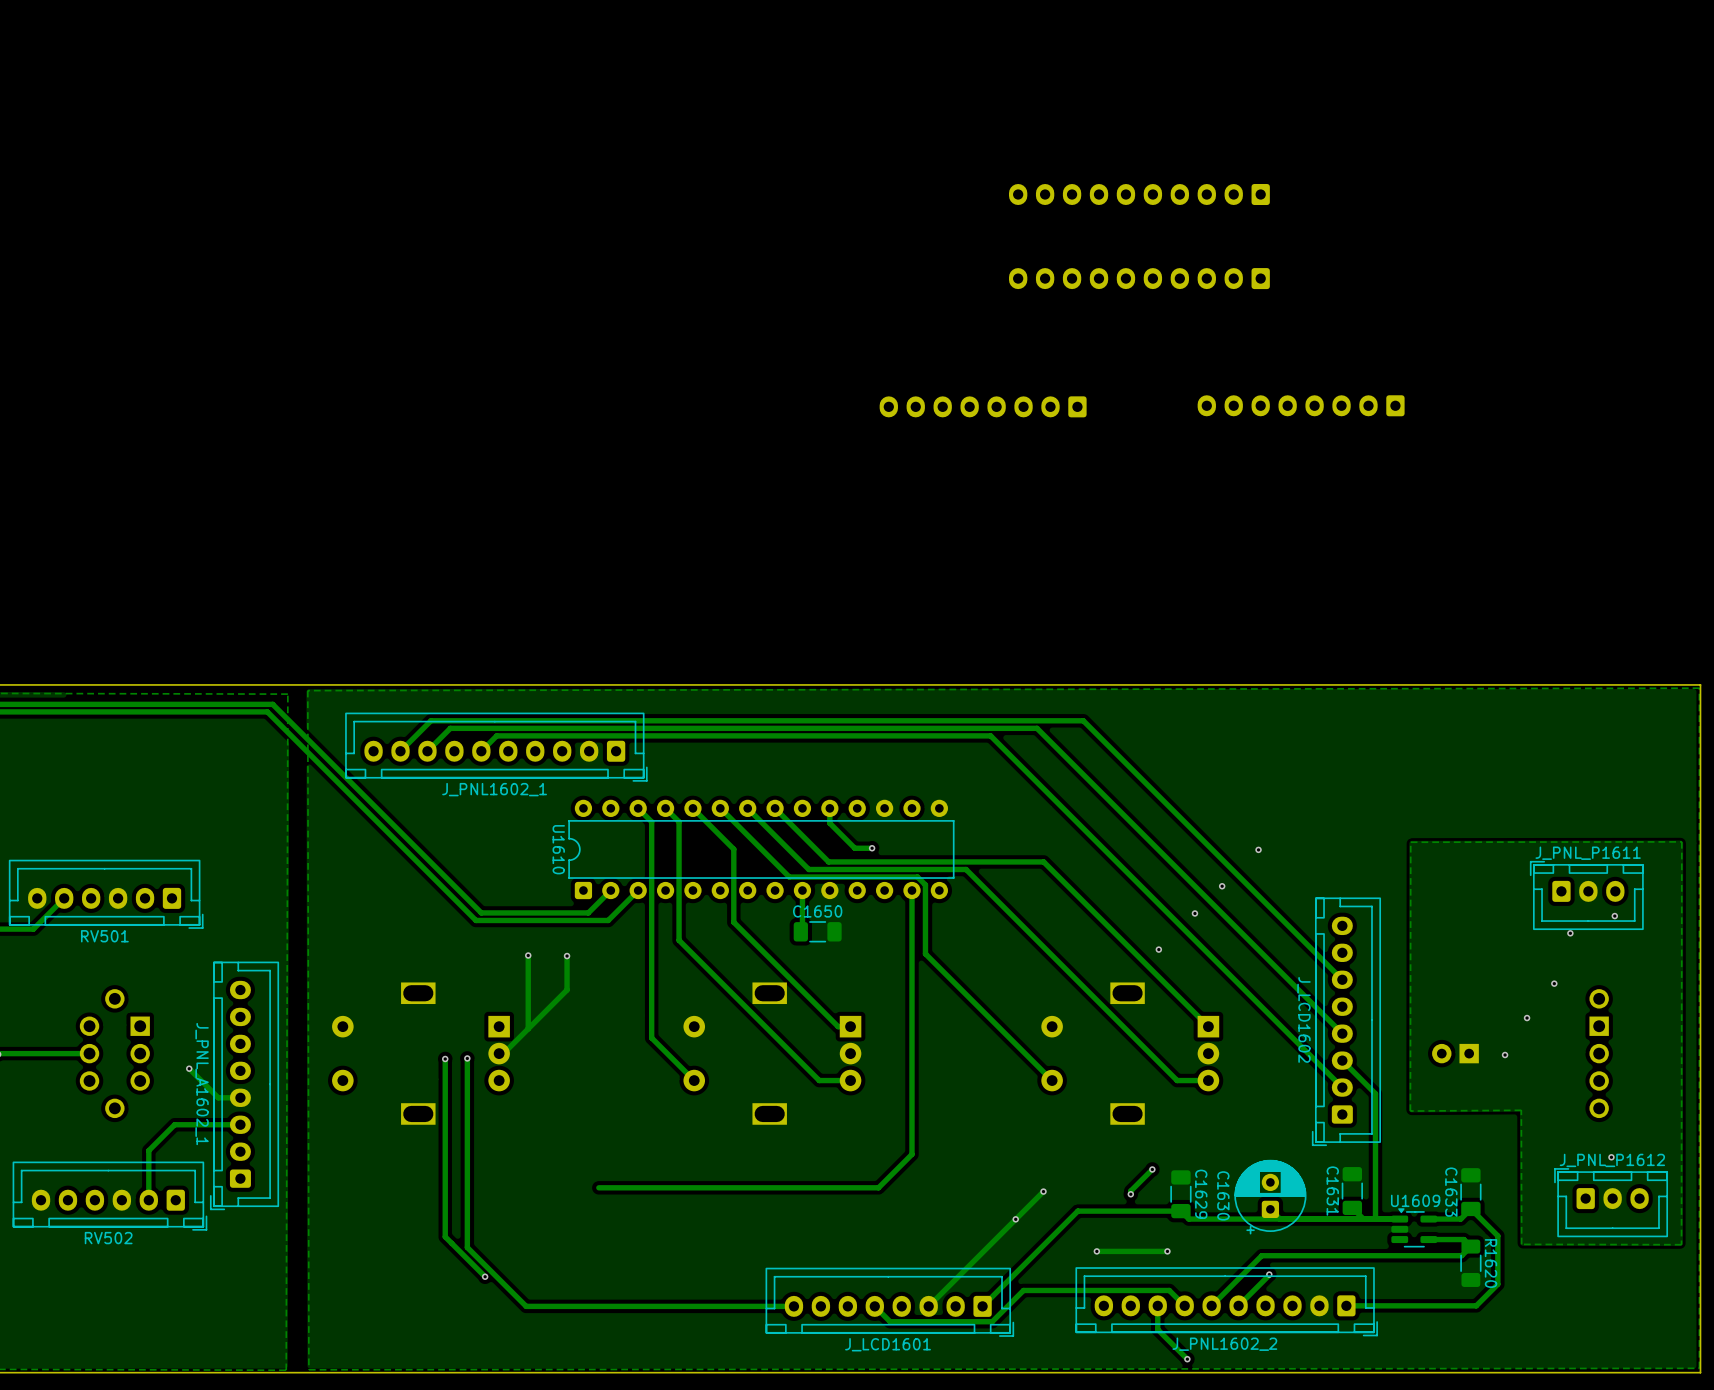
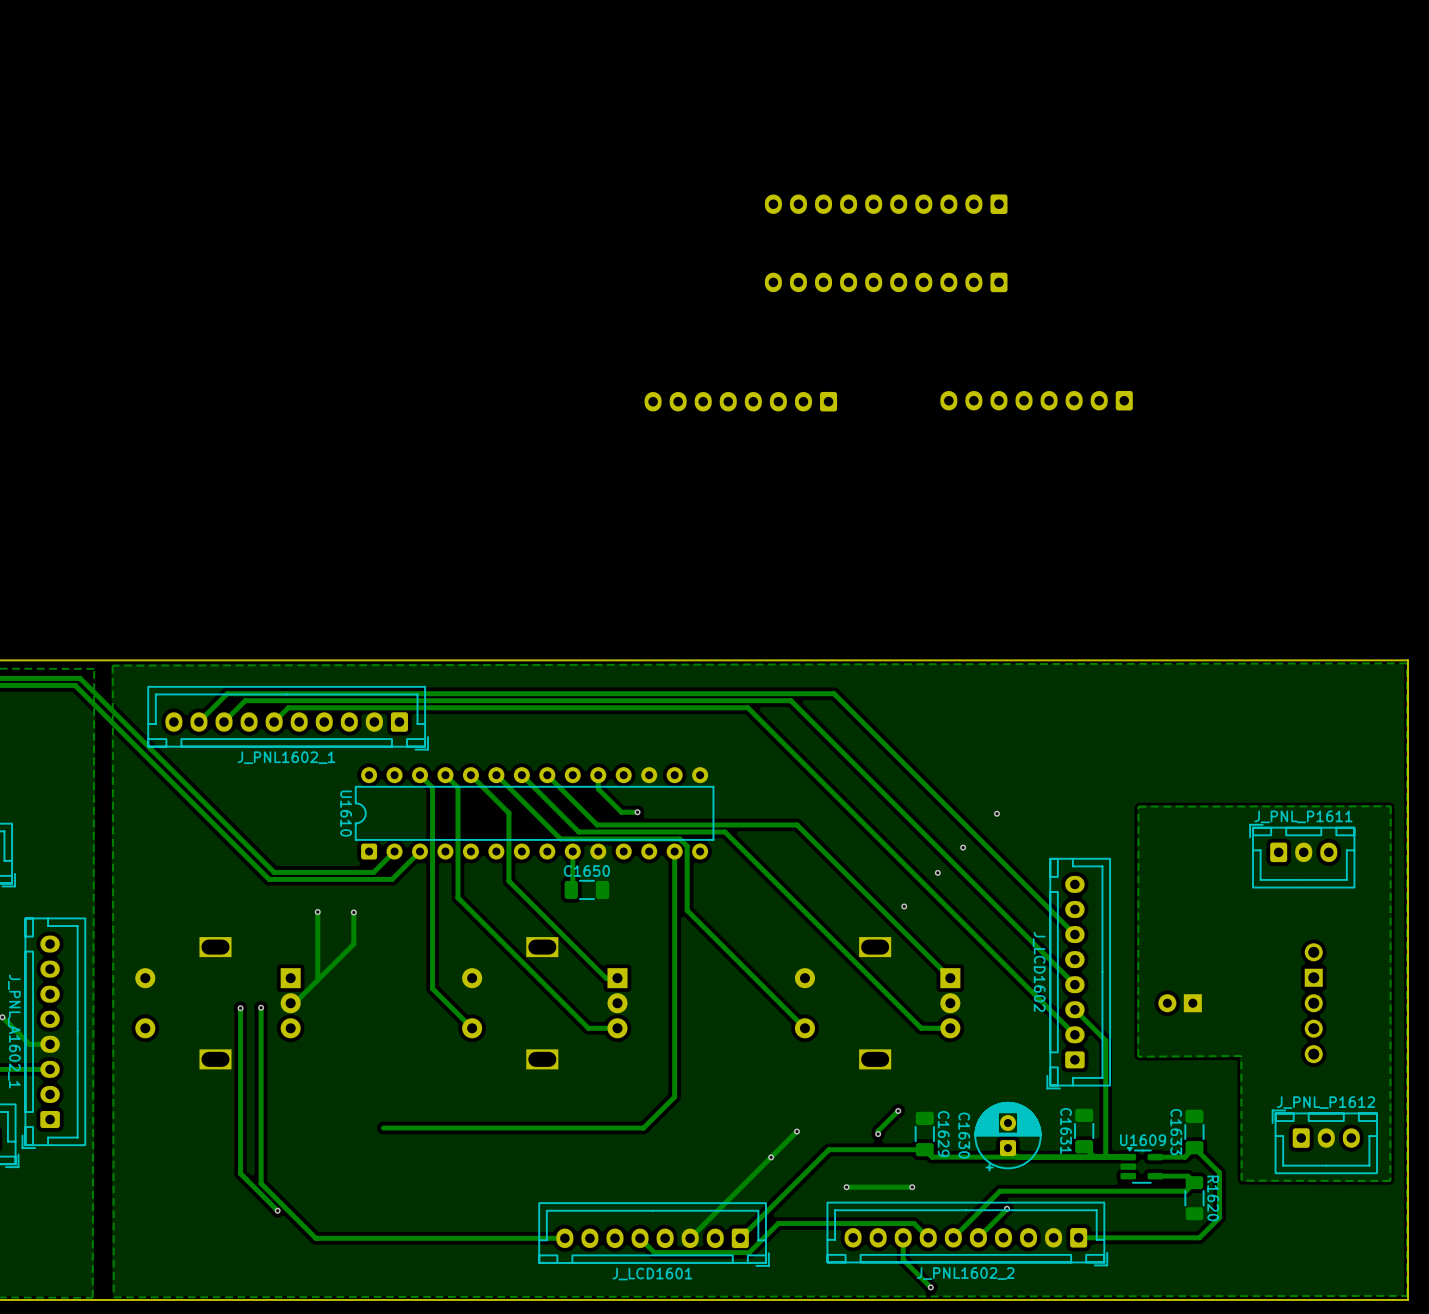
via: (1614, 916) -> none
via: (1570, 933) -> none
via: (1554, 983) -> none
via: (1527, 1018) -> none
via: (1505, 1055) -> none
via: (1611, 1157) -> none

